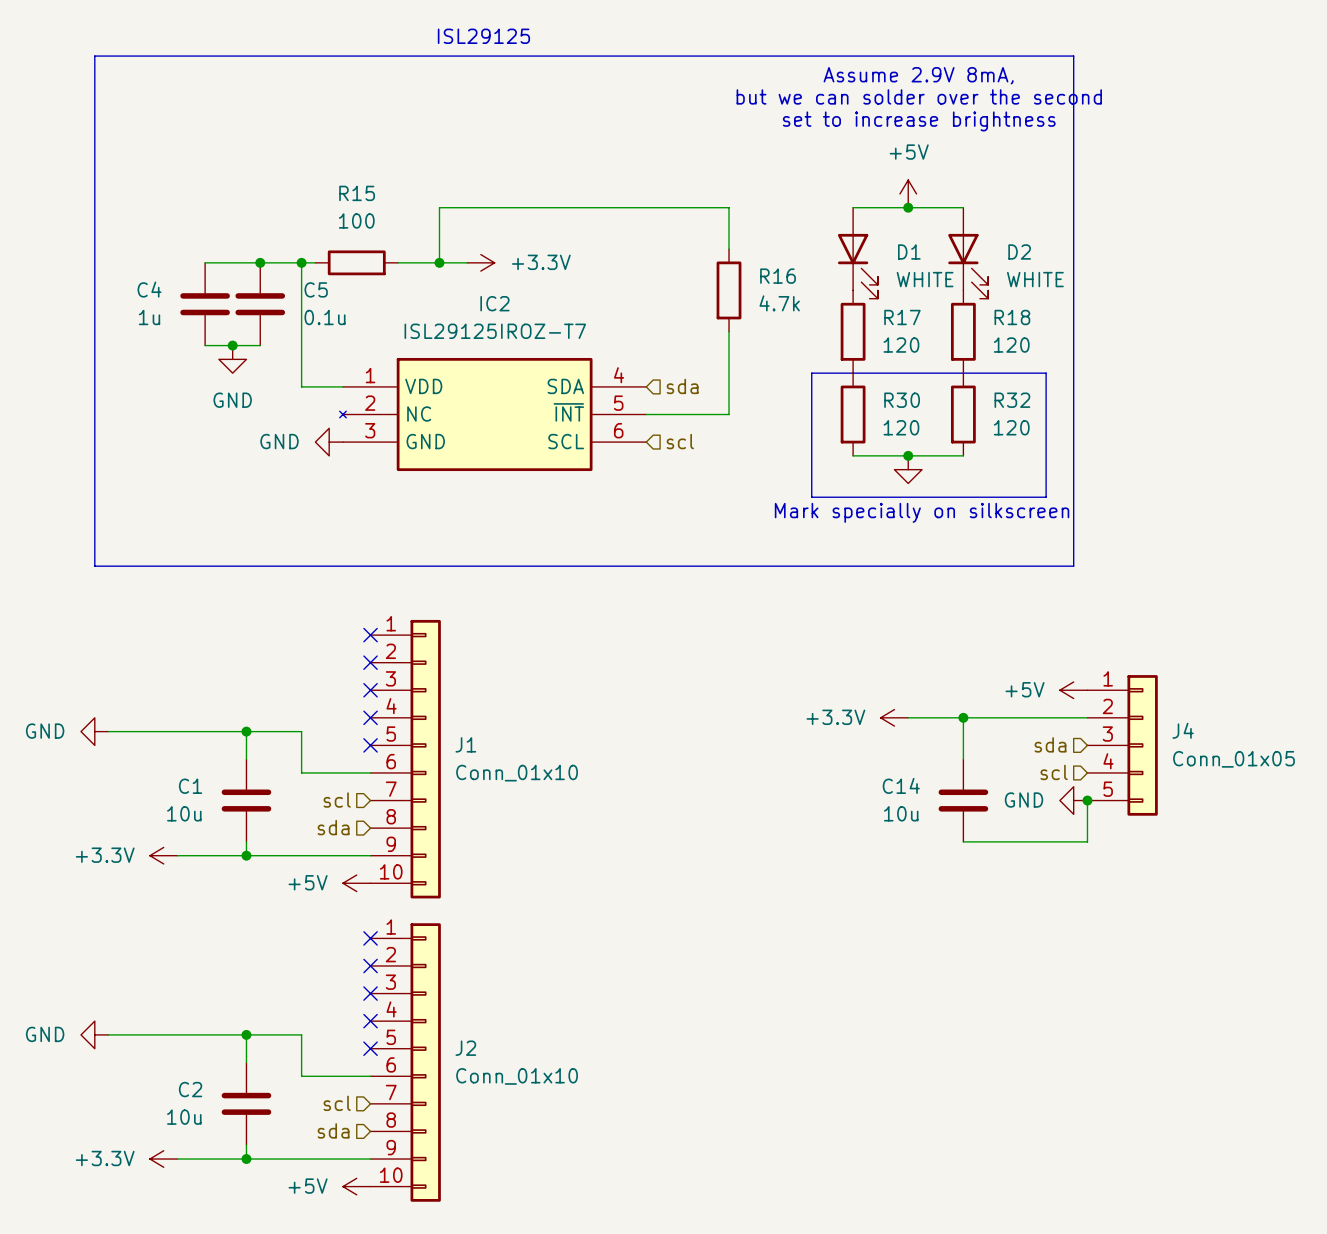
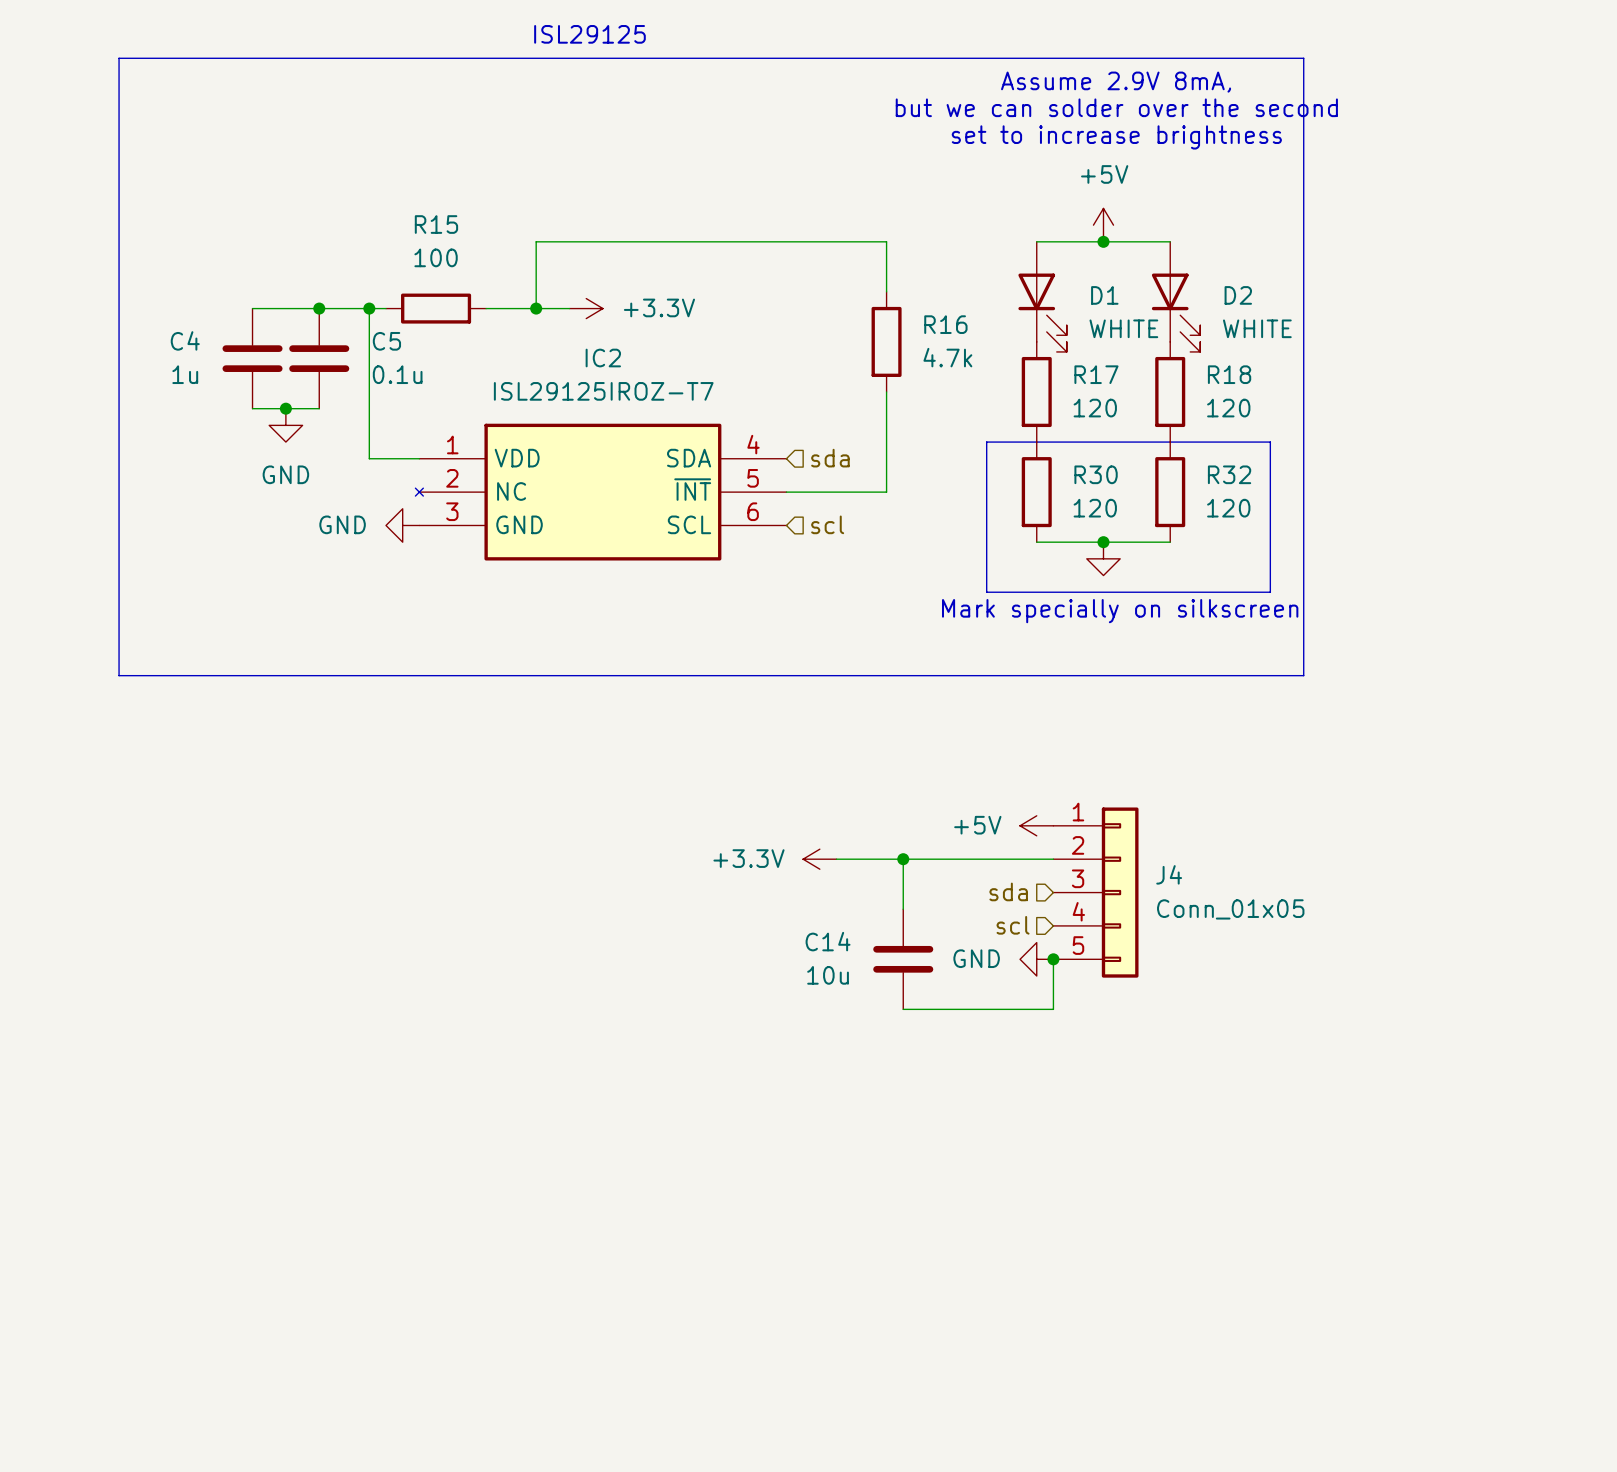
no-connect mark: (370, 635) -> none
no-connect mark: (370, 662) -> none
no-connect mark: (370, 690) -> none
power symbol position: +5V (1073, 690) -> +5V (1036, 825)
no-connect mark: (370, 717) -> none
junction: none -> (903, 859)
power symbol position: +3.3V (894, 717) -> +3.3V (819, 859)
wire: (908, 717) (1087, 717) -> (836, 859) (1053, 859)
wire: (963, 717) (963, 759) -> (903, 859) (903, 909)
junction: (963, 717) -> none
power symbol: GND (94, 731) -> none
wire: (108, 731) (301, 731) (301, 772) (370, 772) -> none
wire: (246, 731) (246, 759) -> none
junction: (246, 731) -> none
hierarchical label position: sda (1050, 744) -> sda (1008, 891)
no-connect mark: (370, 745) -> none
J4 position: (1122, 745) -> (1095, 892)
J1: Conn_01x10 (405, 759) -> none
hierarchical label position: scl (1054, 772) -> scl (1013, 925)
C1: 10u (246, 800) -> none
hierarchical label: scl (337, 800) -> none
junction: none -> (1053, 959)
C14 position: (963, 800) -> (903, 959)
power symbol position: GND (1073, 800) -> GND (1036, 959)
wire: (1087, 800) (1087, 841) (963, 841) -> (1053, 959) (1053, 1009) (903, 1009)
junction: (1087, 800) -> none
hierarchical label: sda (333, 827) -> none
wire: (246, 841) (246, 855) -> none
power symbol: +3.3V (163, 855) -> none
wire: (177, 855) (370, 855) -> none
junction: (246, 855) -> none
power symbol: +5V (356, 883) -> none
no-connect mark: (370, 938) -> none
no-connect mark: (370, 965) -> none
no-connect mark: (370, 993) -> none
no-connect mark: (370, 1021) -> none
power symbol: GND (94, 1034) -> none
wire: (108, 1034) (301, 1034) (301, 1076) (370, 1076) -> none
wire: (246, 1034) (246, 1062) -> none
junction: (246, 1034) -> none
no-connect mark: (370, 1048) -> none
J2: Conn_01x10 (405, 1062) -> none
C2: 10u (246, 1103) -> none
hierarchical label: scl (337, 1103) -> none
hierarchical label: sda (333, 1130) -> none
wire: (246, 1145) (246, 1159) -> none
power symbol: +3.3V (163, 1159) -> none
wire: (177, 1159) (370, 1159) -> none
junction: (246, 1159) -> none
power symbol: +5V (356, 1186) -> none

